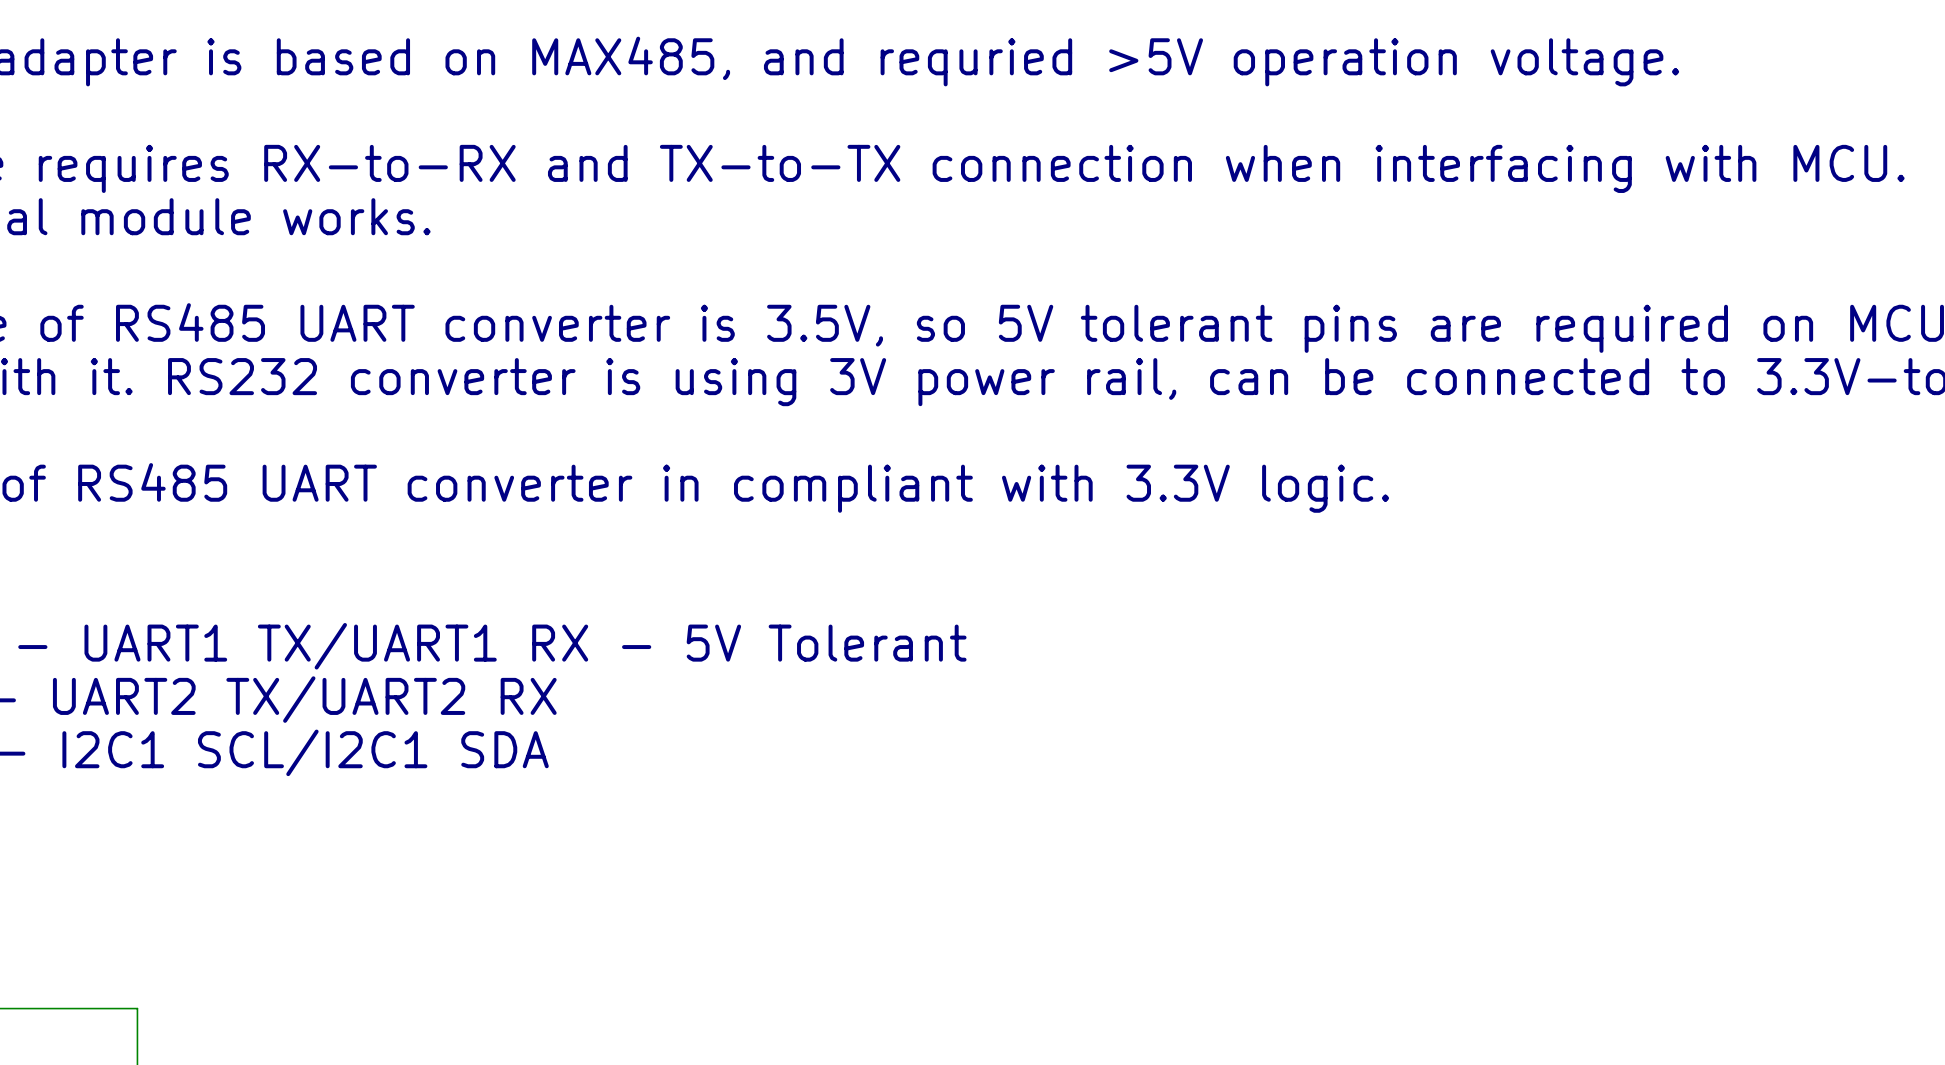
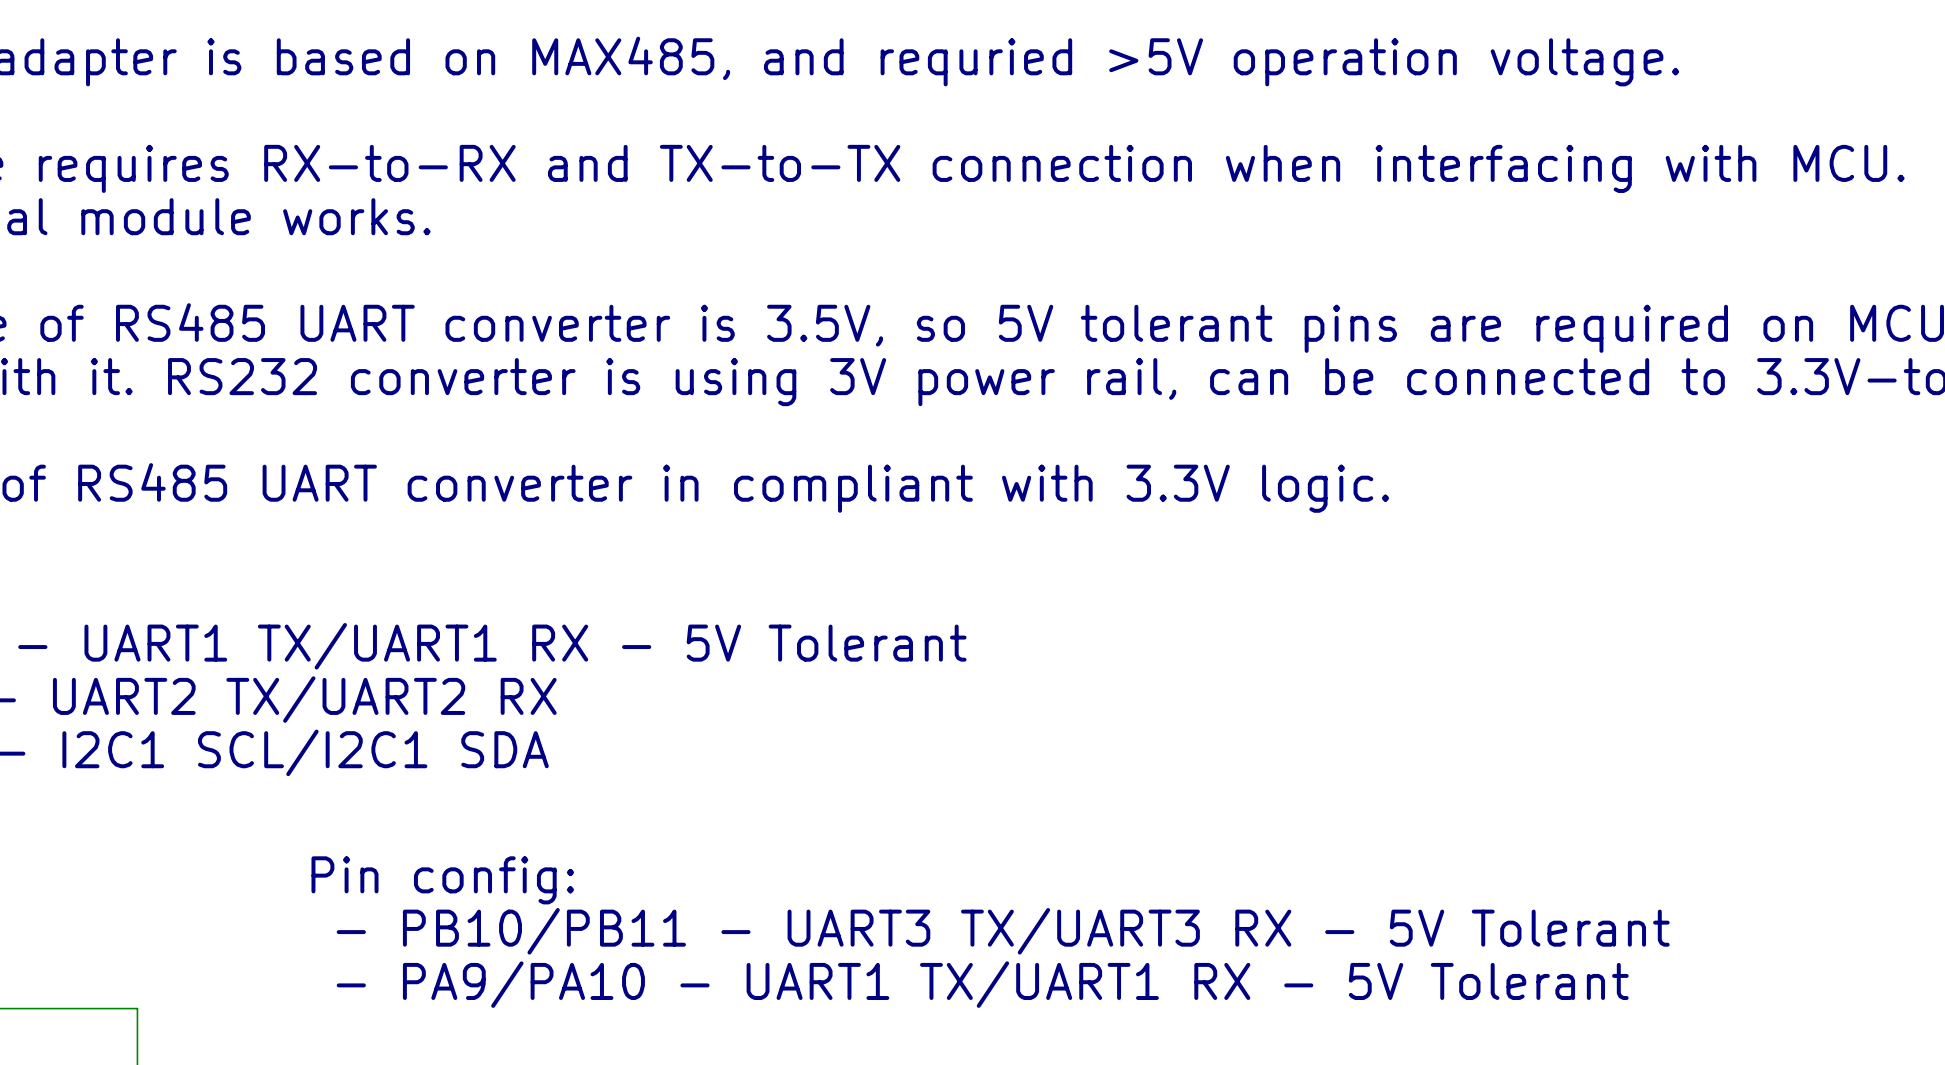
text: none -> Pin config: (442, 880)
text: none -> - PB10/PB11 - UART3 TX/UART3 RX - 5V Tolerant (1003, 931)
text: none -> - PA9/PA10 - UART1 TX/UART1 RX - 5V Tolerant (982, 984)

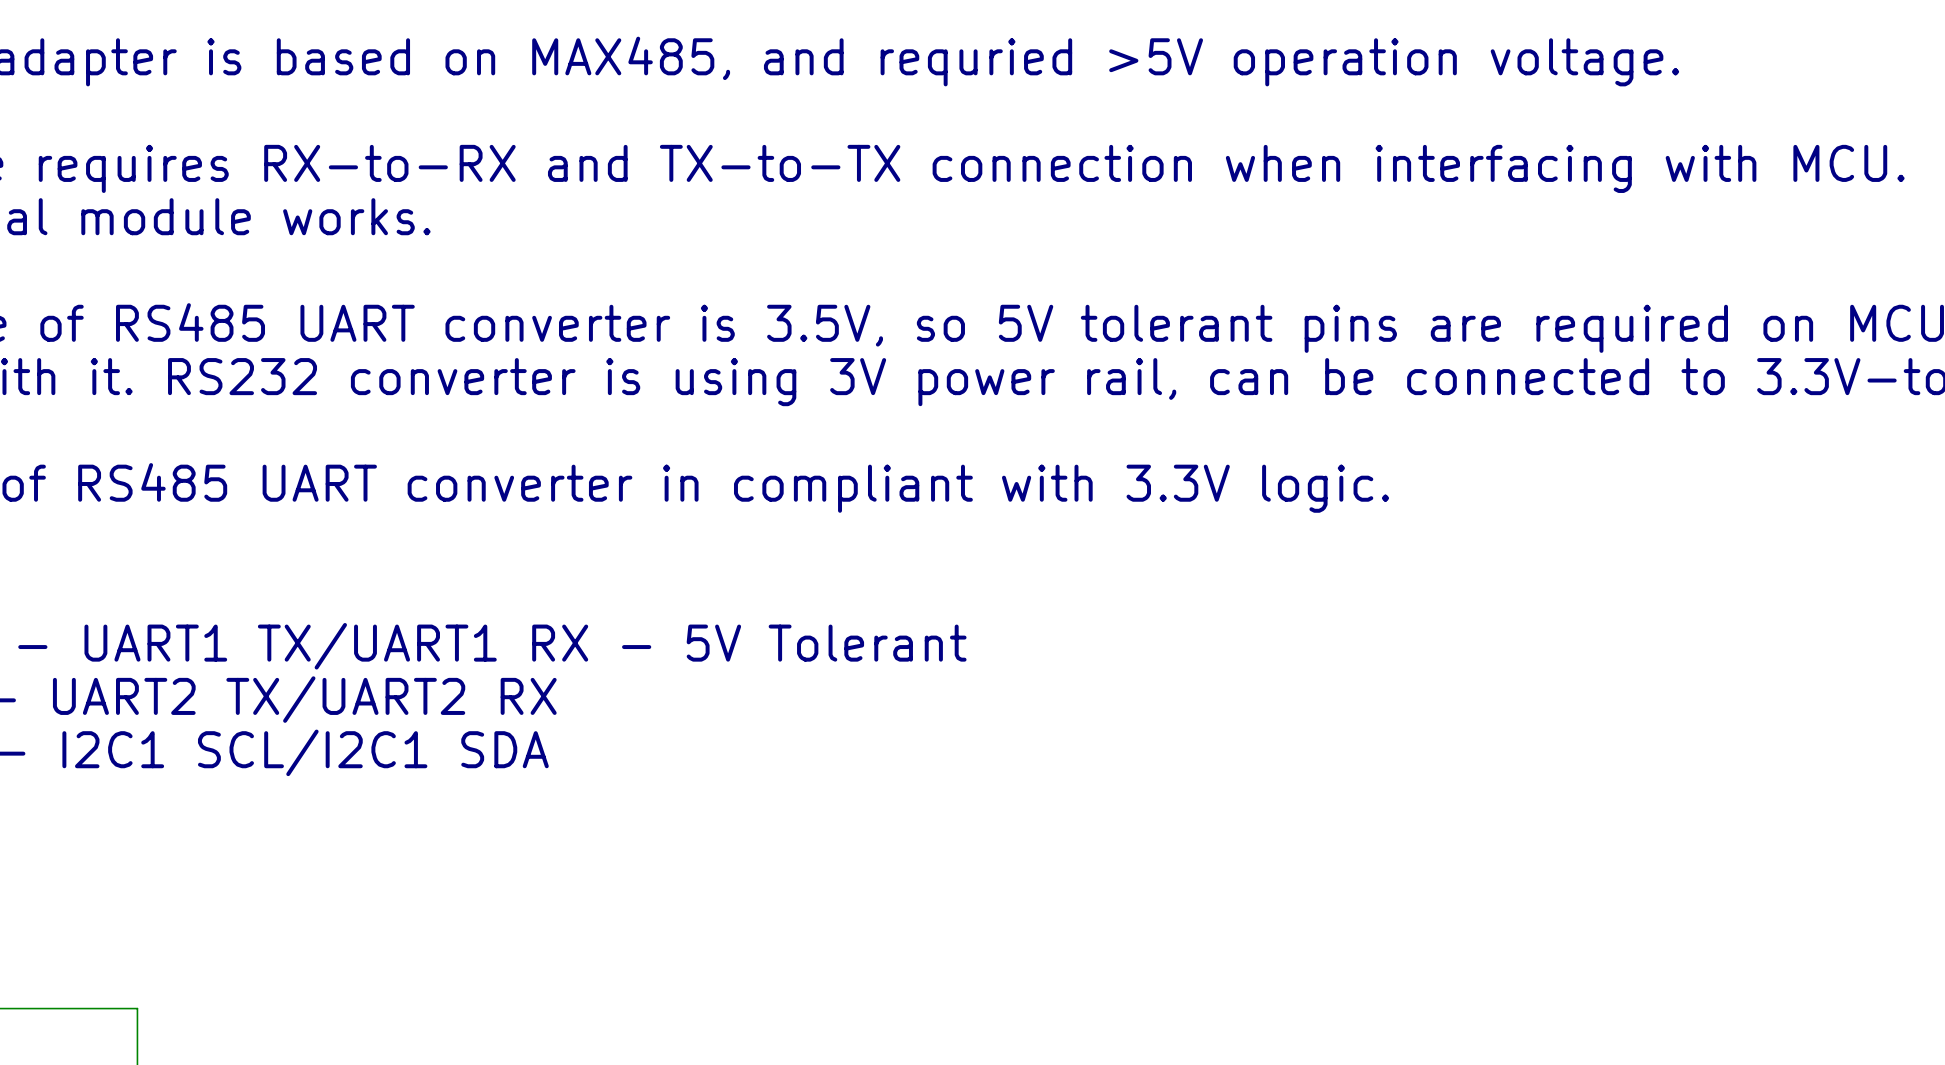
text: Pin config: (442, 880) -> none
text: - PB10/PB11 - UART3 TX/UART3 RX - 5V Tolerant (1003, 931) -> none
text: - PA9/PA10 - UART1 TX/UART1 RX - 5V Tolerant (982, 984) -> none

